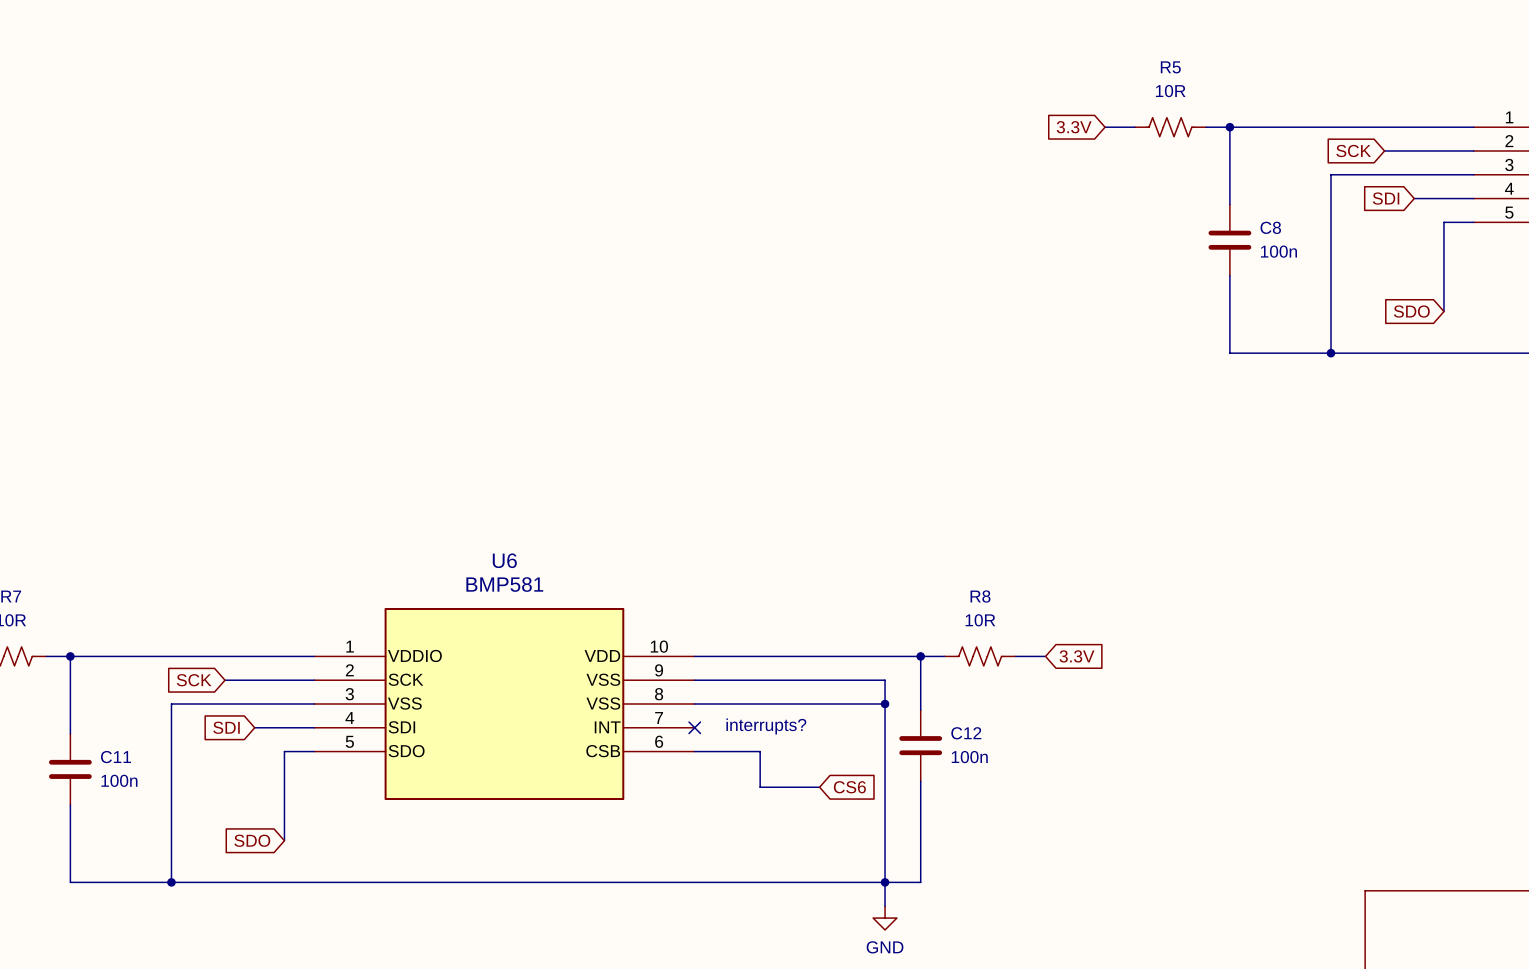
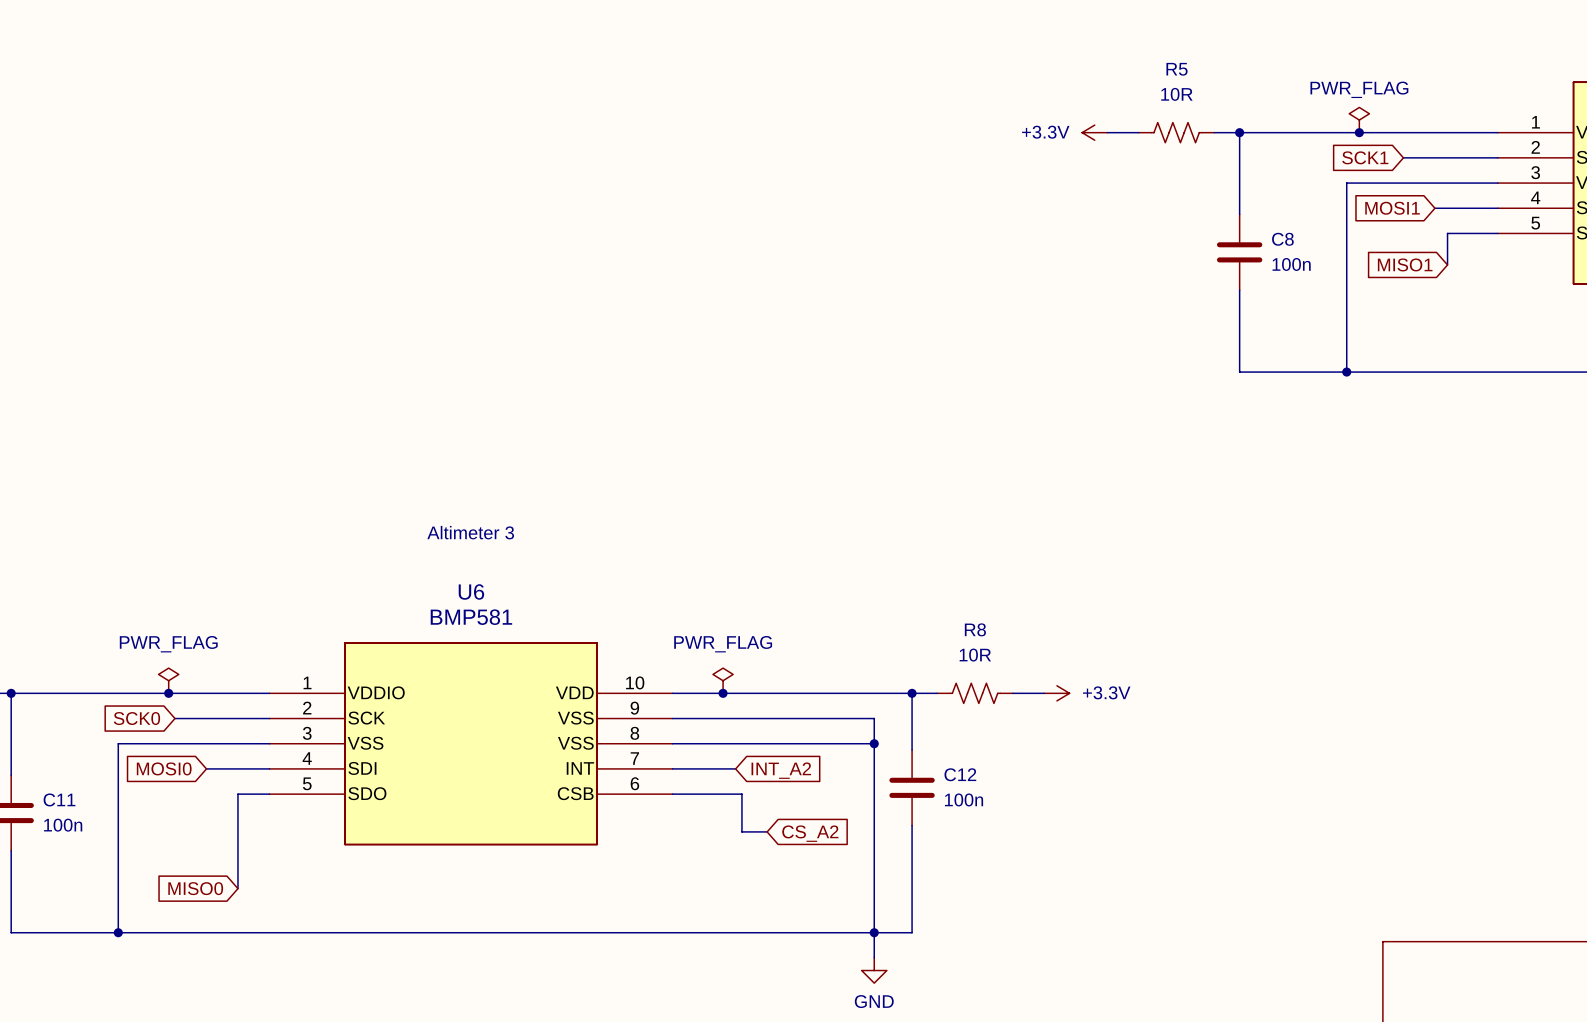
power symbol: none -> PWR_FLAG (1359, 120)
global label: 3.3V (1074, 127) -> none
power symbol: none -> +3.3V (1094, 132)
junction: none -> (1359, 132)
global label: SCK (1353, 150) -> SCK1 (1365, 157)
global label: SDI (1386, 198) -> MOSI1 (1392, 208)
wire: (1443, 222) (1443, 311) -> (1466, 233) (1447, 233) (1447, 264)
global label: none -> MISO1 (1405, 264)
global label: SDO (1411, 311) -> none
text: none -> Altimeter 3 (470, 532)
power symbol: none -> PWR_FLAG (168, 680)
power symbol: none -> PWR_FLAG (723, 680)
junction: none -> (168, 693)
junction: none -> (723, 693)
power symbol: none -> +3.3V (1056, 693)
global label: 3.3V (1077, 656) -> none
global label: SCK (194, 680) -> SCK0 (136, 718)
text: interrupts? (766, 726) -> none
global label: SDI (226, 727) -> MOSI0 (164, 768)
wire: none -> (672, 768) (735, 768)
no-connect mark: (694, 727) -> none
global label: none -> INT_A2 (781, 770)
wire: (783, 787) (819, 787) -> none
global label: CS6 (849, 787) -> none
global label: none -> CS_A2 (810, 833)
global label: SDO (252, 840) -> MISO0 (195, 888)

